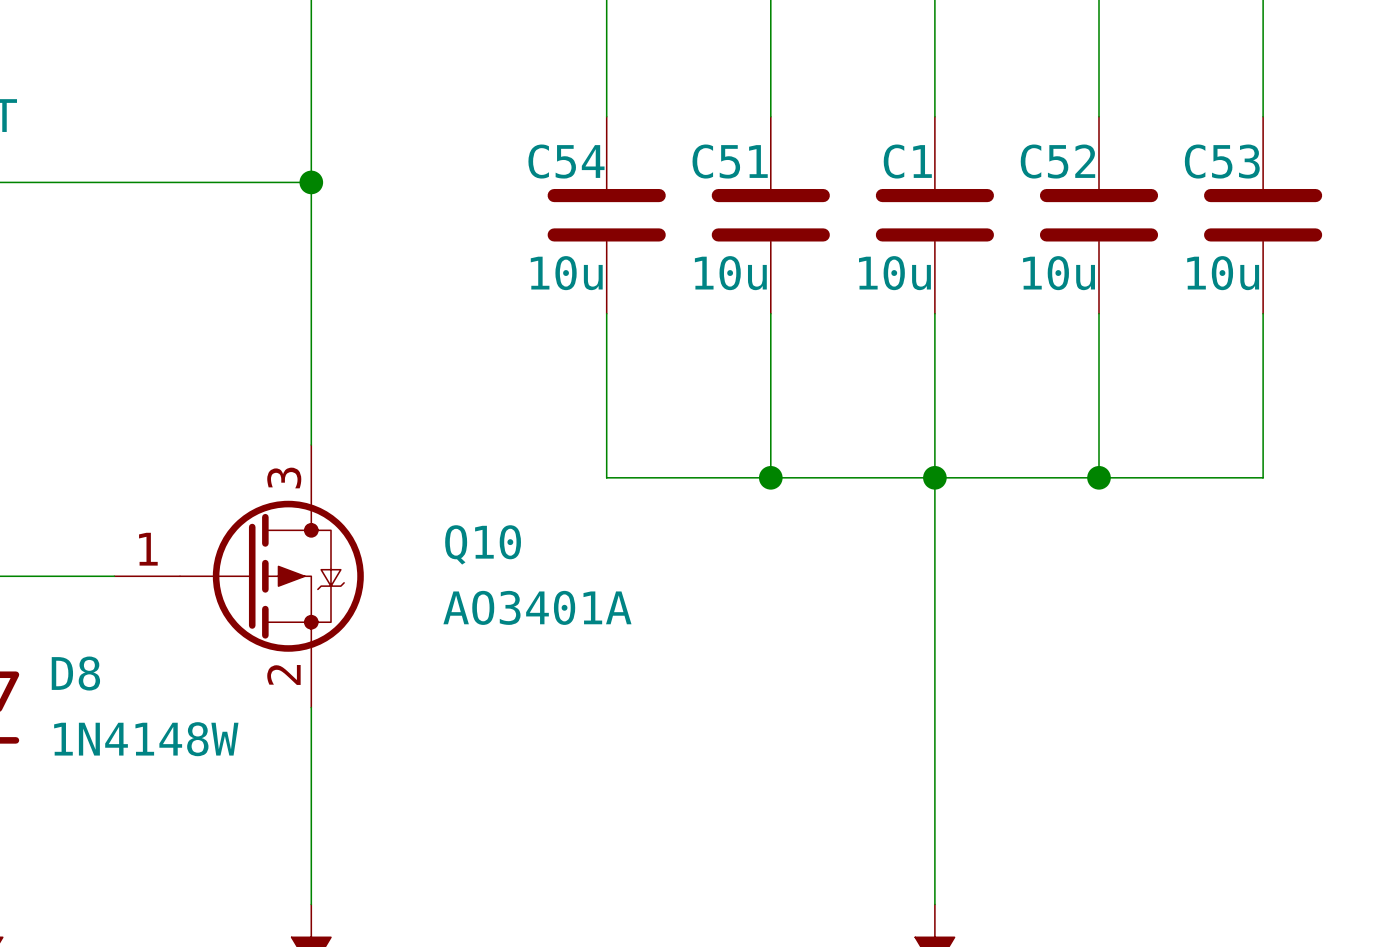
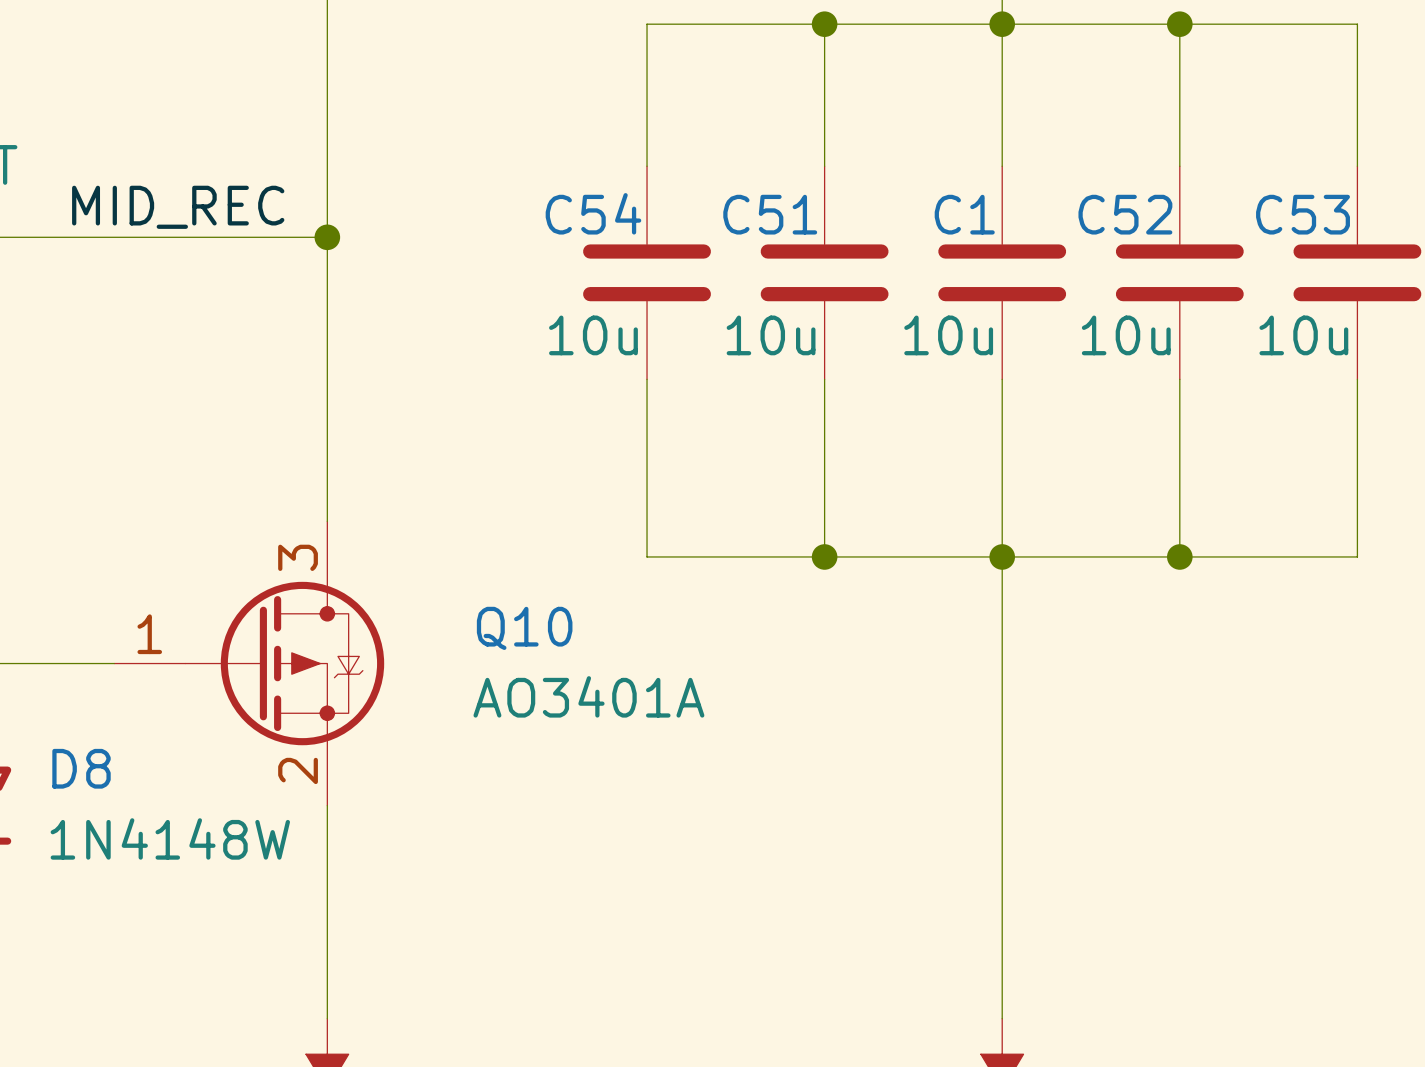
label: none -> MID_REC (178, 207)

